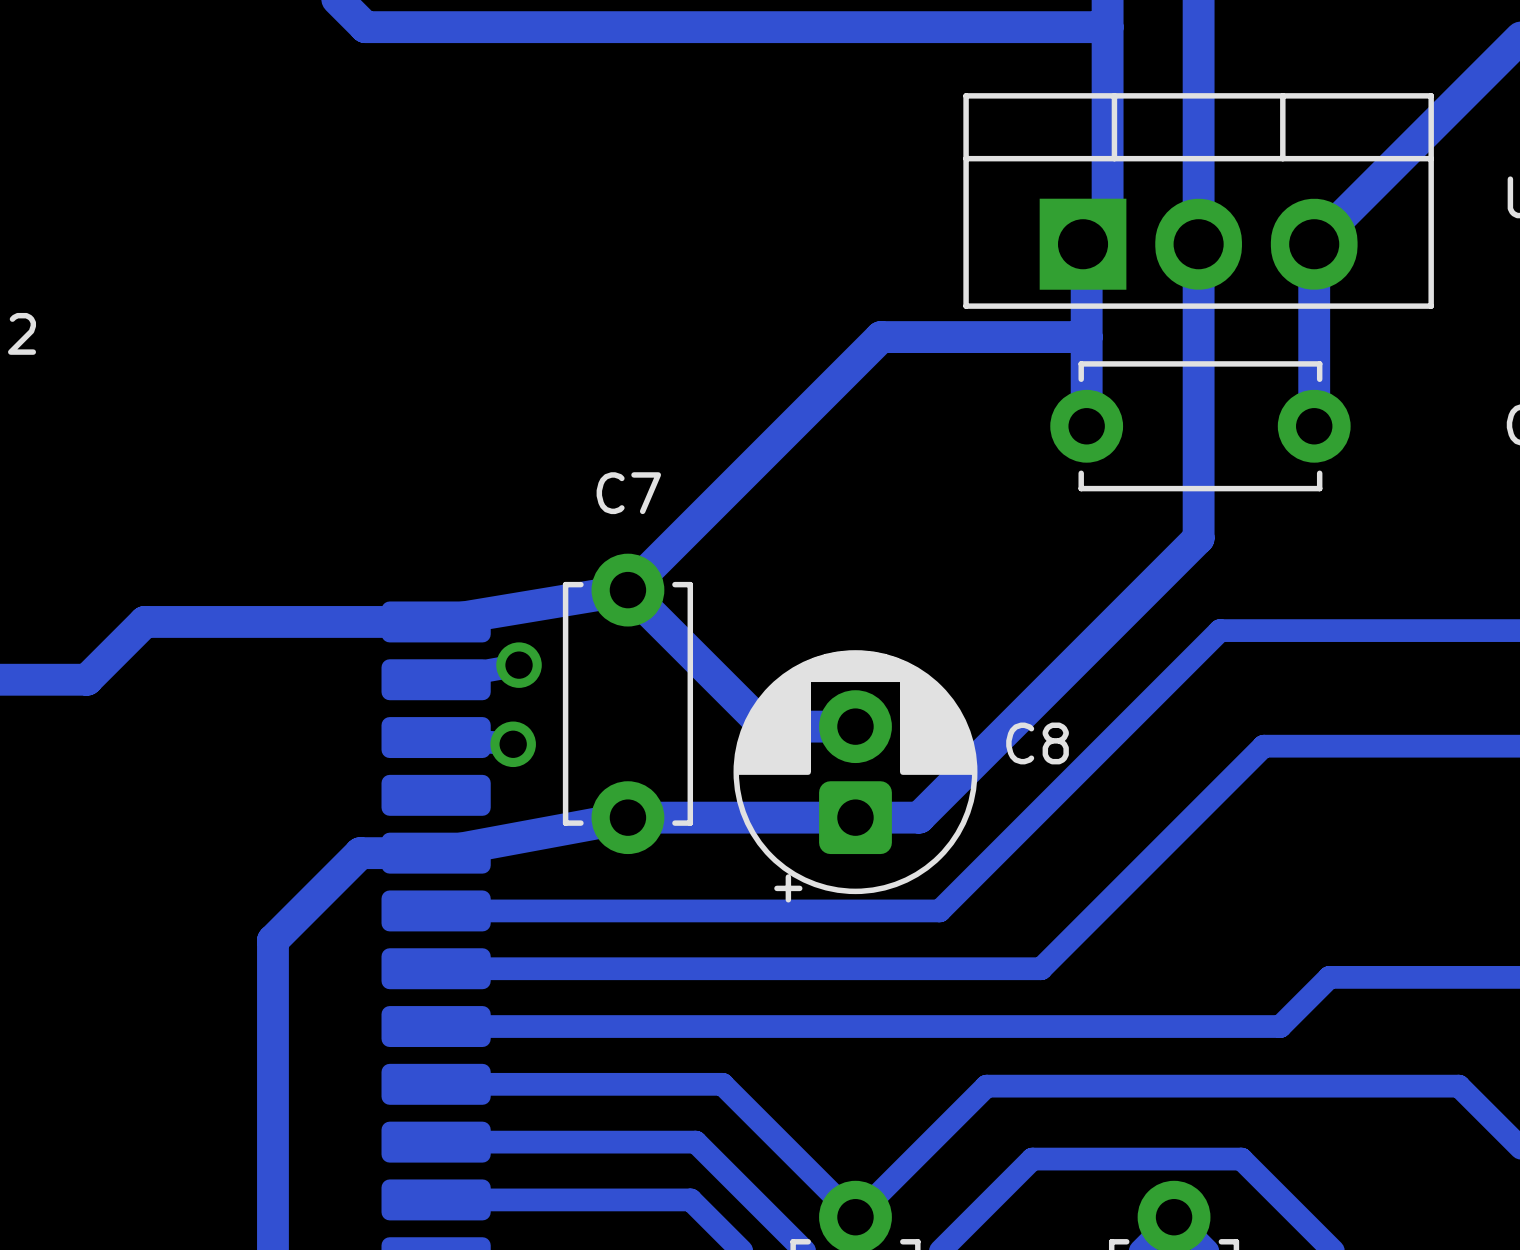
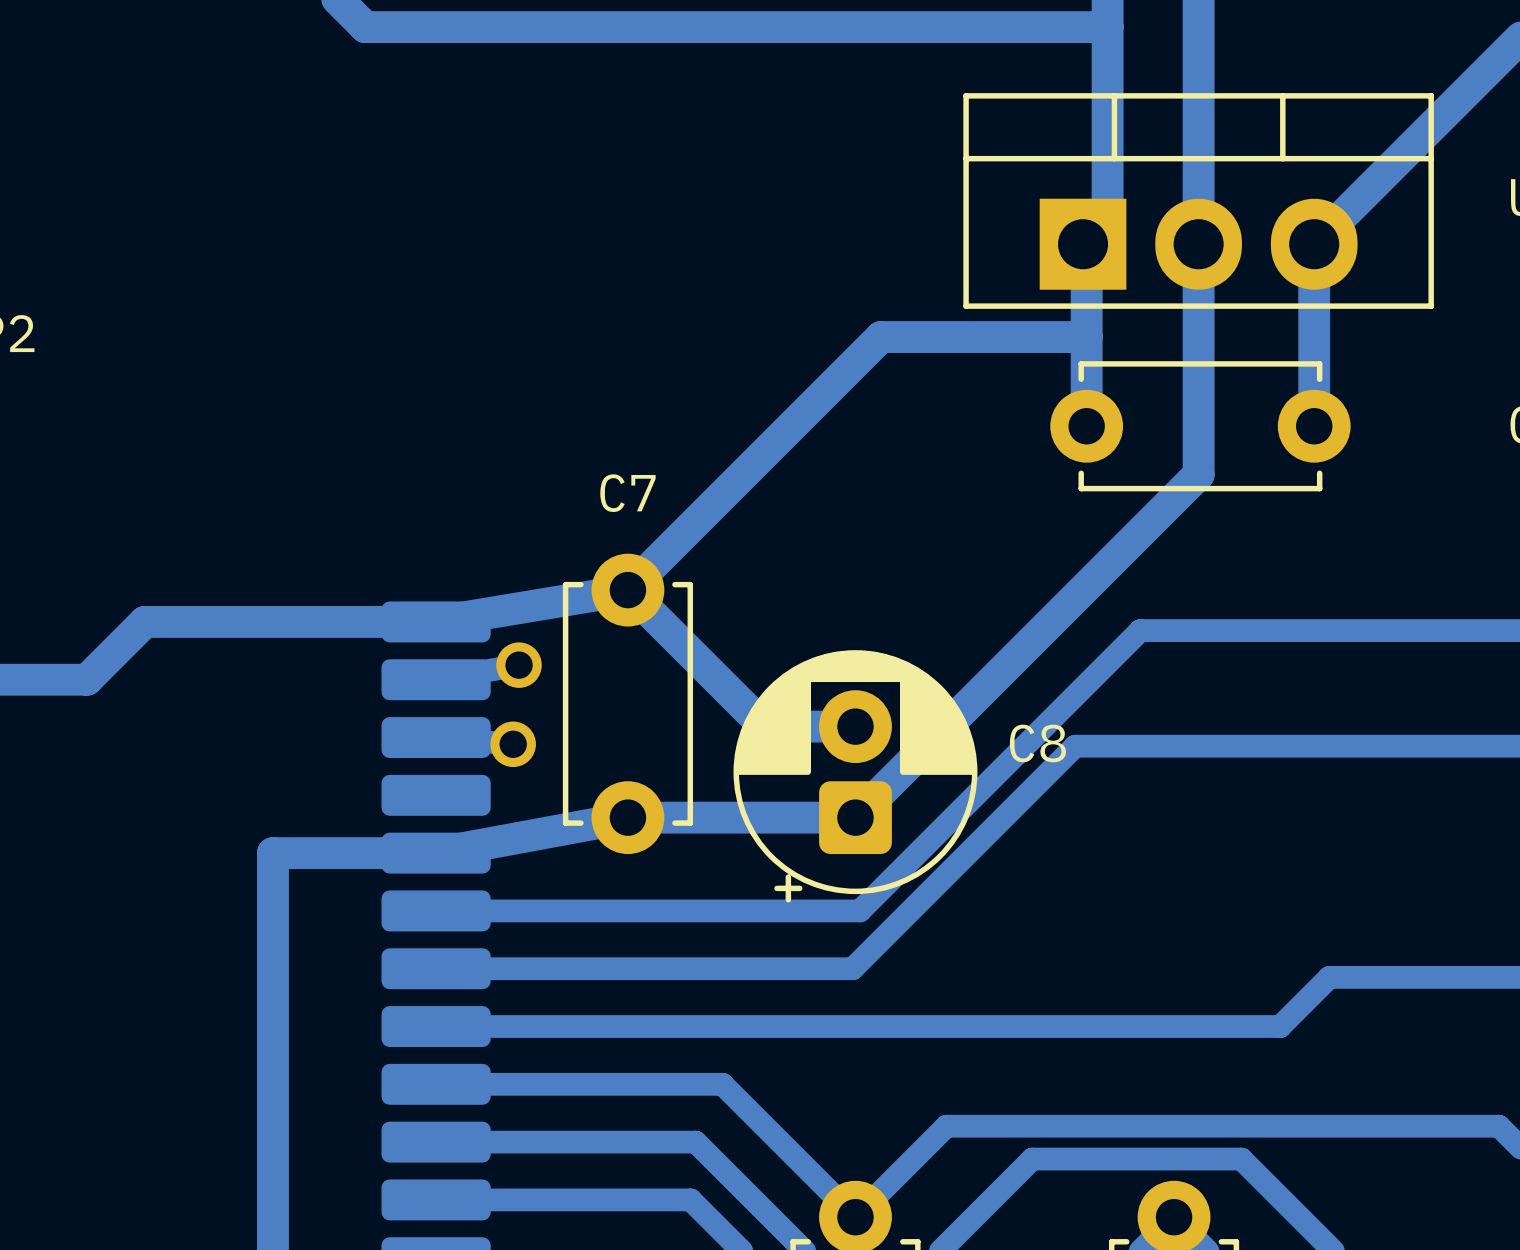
bottom track: (1198, 474) (1198, 538) (919, 817) (855, 817) -> (1198, 474) (855, 817)
bottom track: (1220, 630) (939, 910) (859, 910) -> (1220, 630) (1140, 630) (859, 910)
bottom track: (1263, 746) (1041, 968) (852, 968) -> (1263, 746) (1075, 746) (852, 968)
bottom track: (360, 853) (272, 940) -> (360, 853) (272, 853) (272, 940)
bottom track: (946, 1126) (986, 1086) (1458, 1086) (1499, 1126) -> (946, 1126) (1499, 1126)

